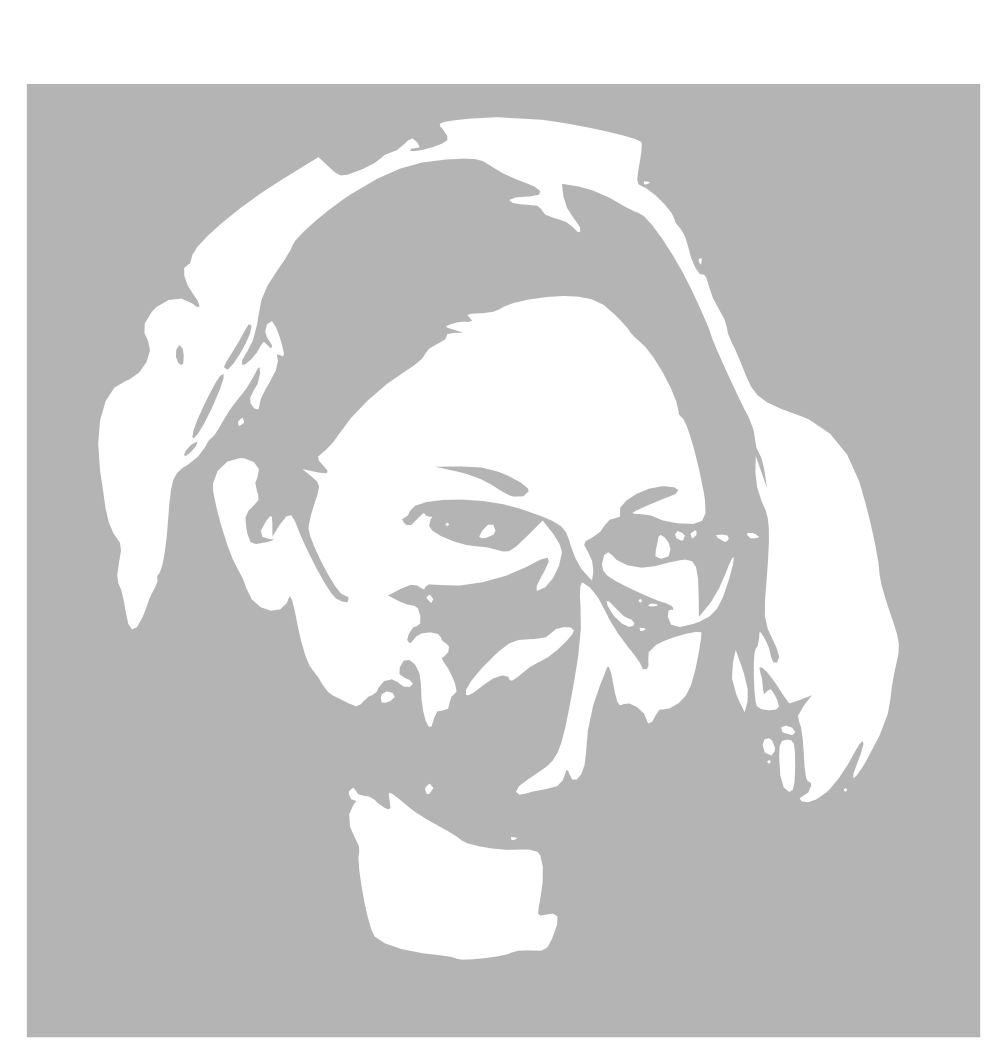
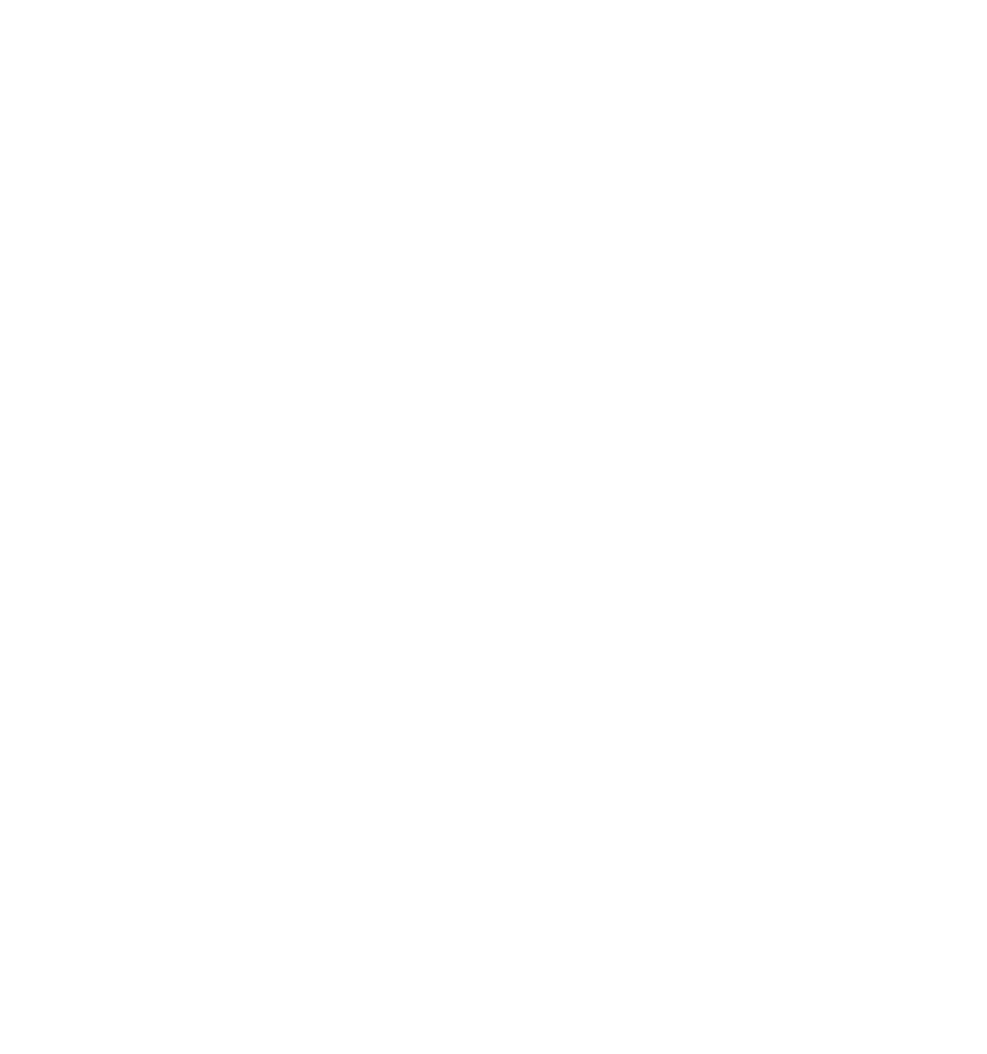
drawing: [26, 83, 981, 1038] -> none

